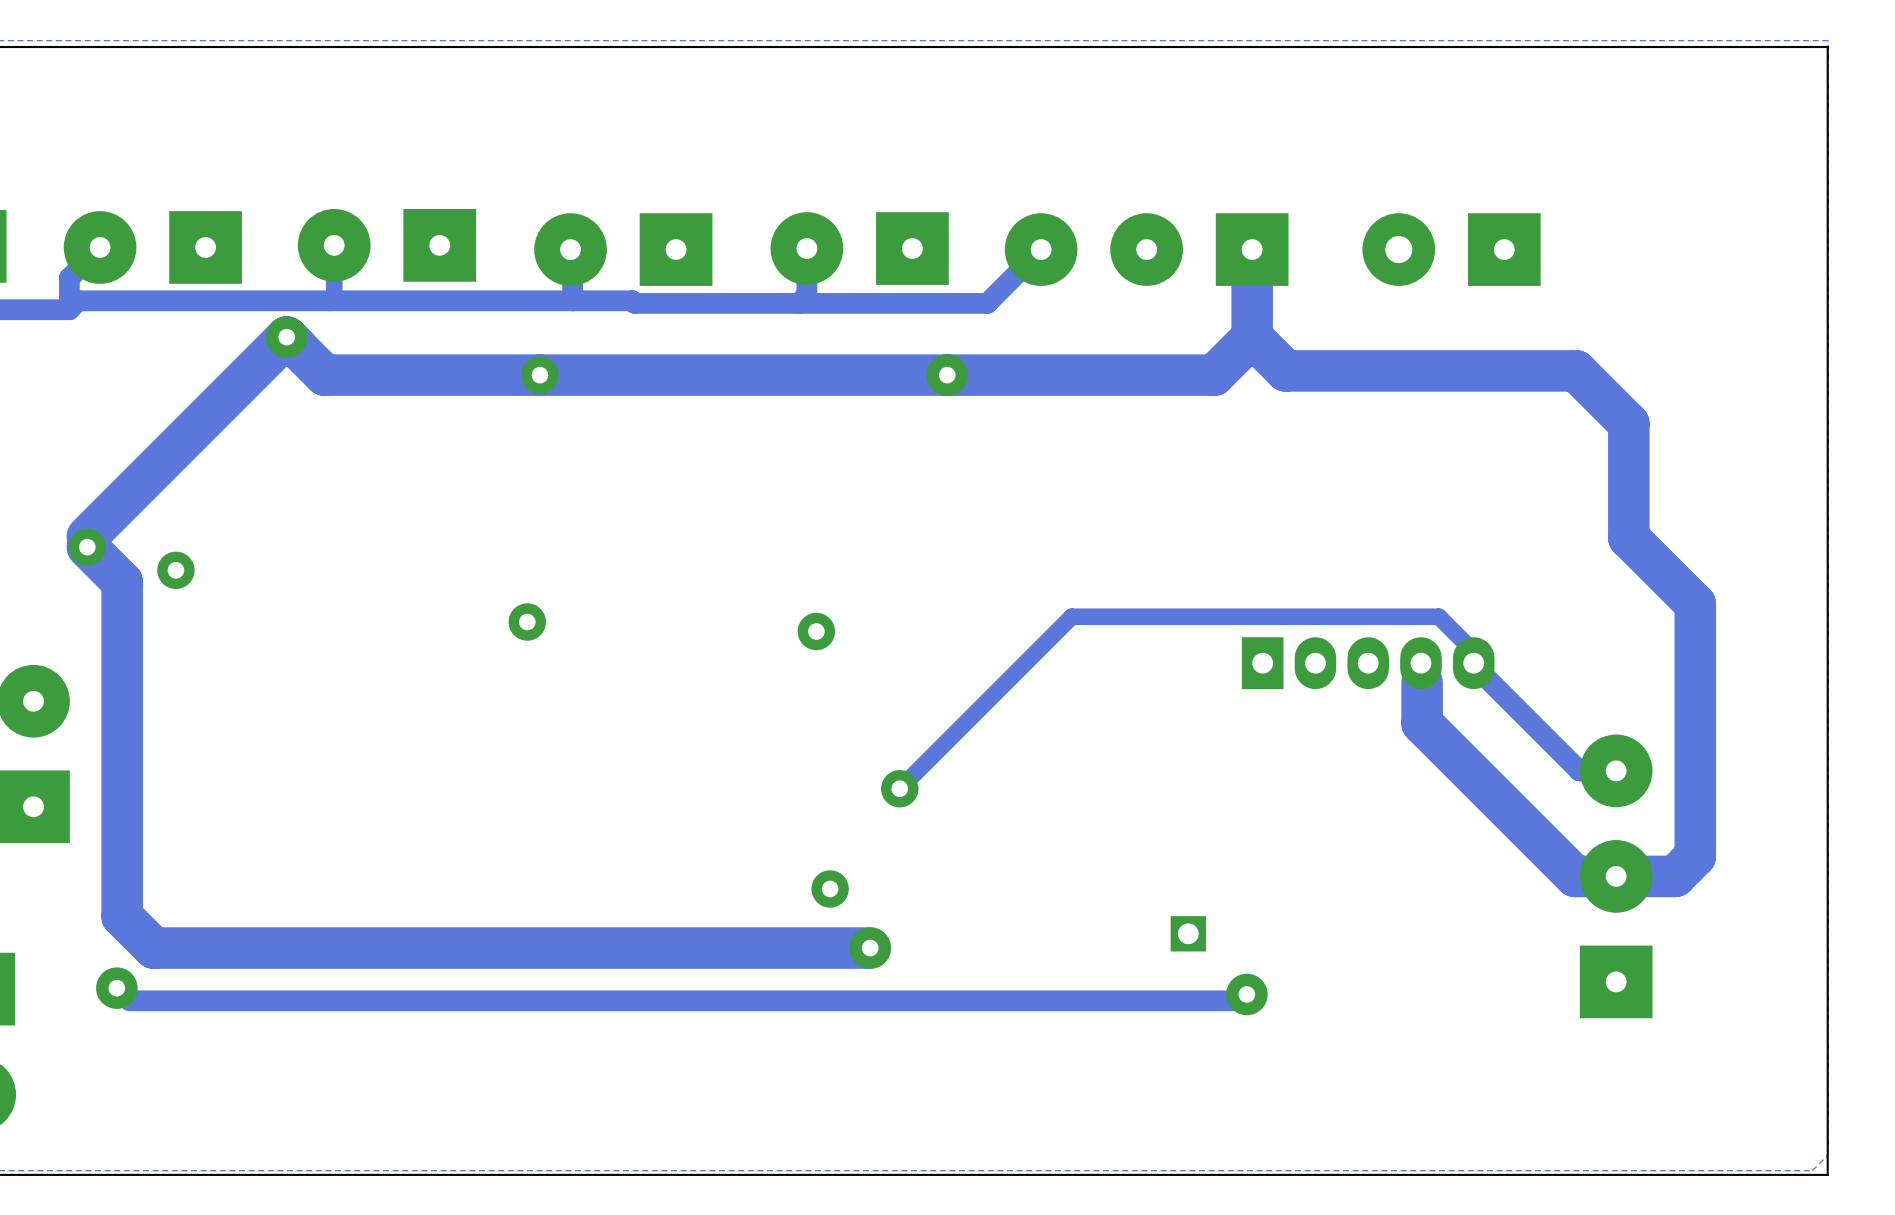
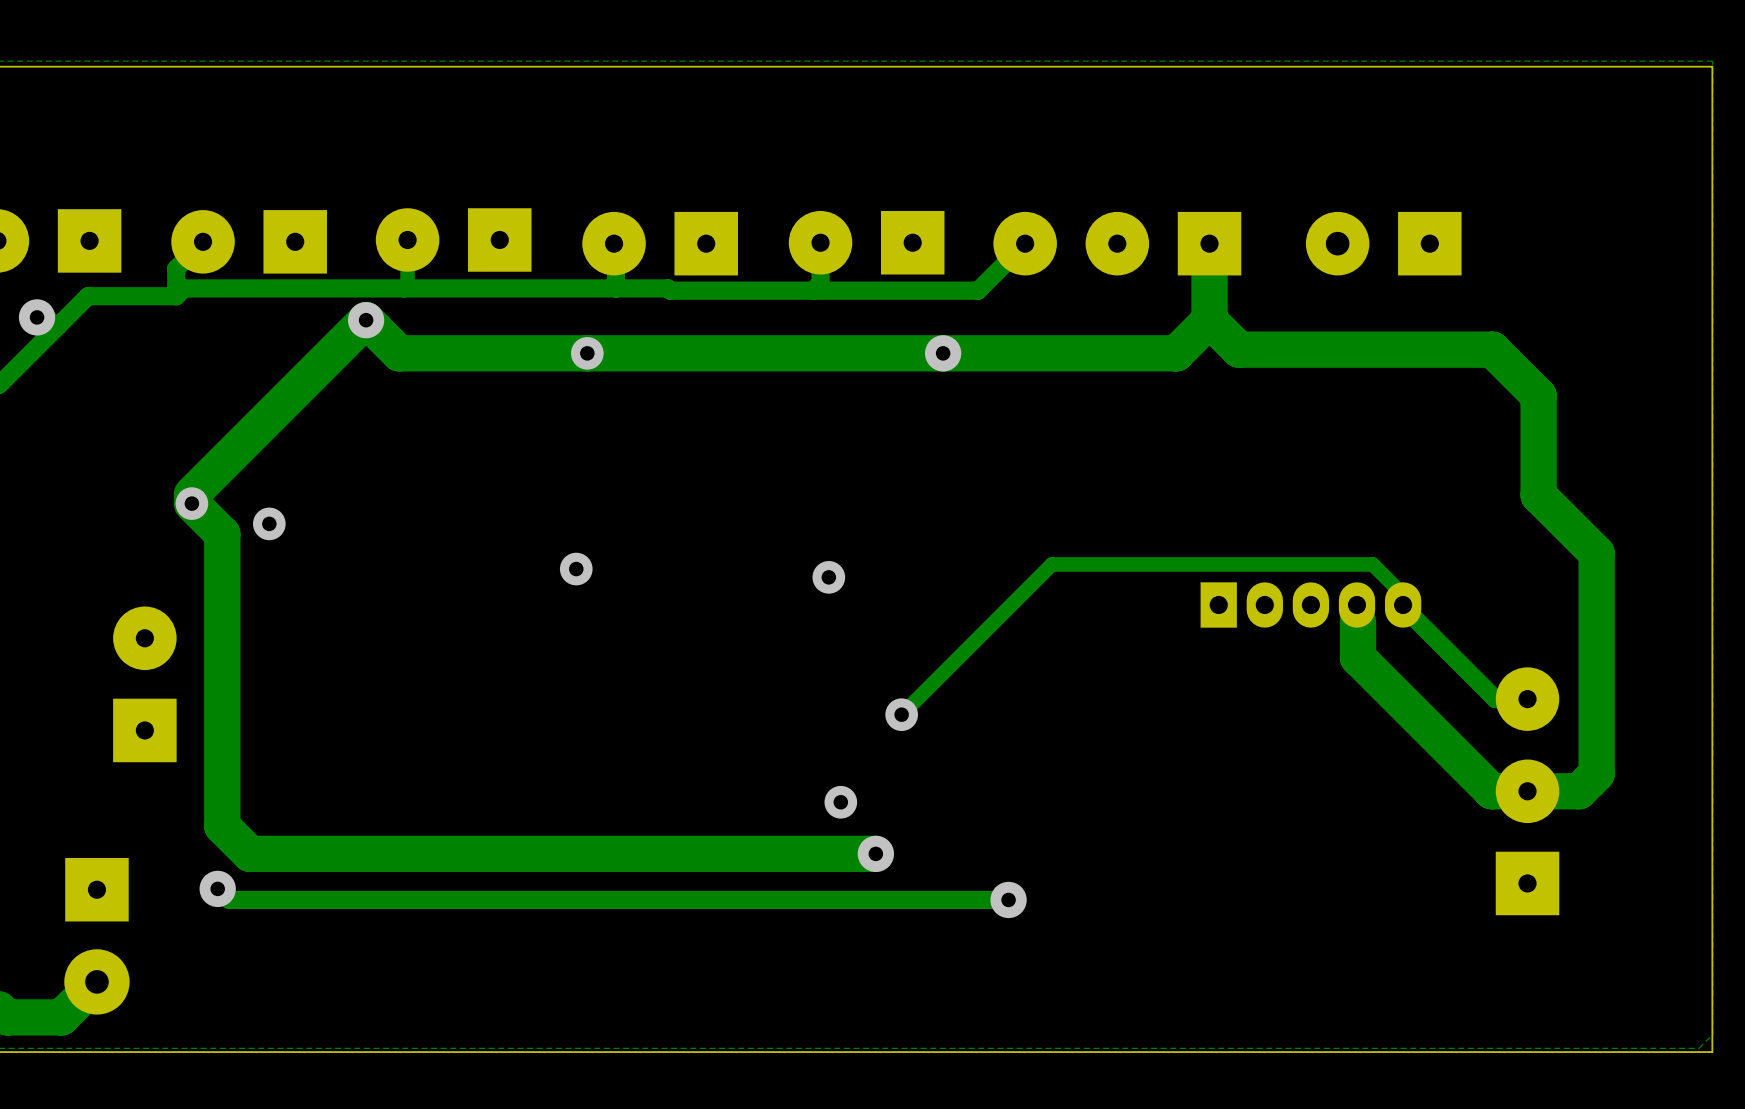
part: (1188, 933) -> none
track: (1246, 994) (1240, 1000) (1022, 1000) -> none
via: (1246, 994) -> none
via: none -> (1008, 899)

